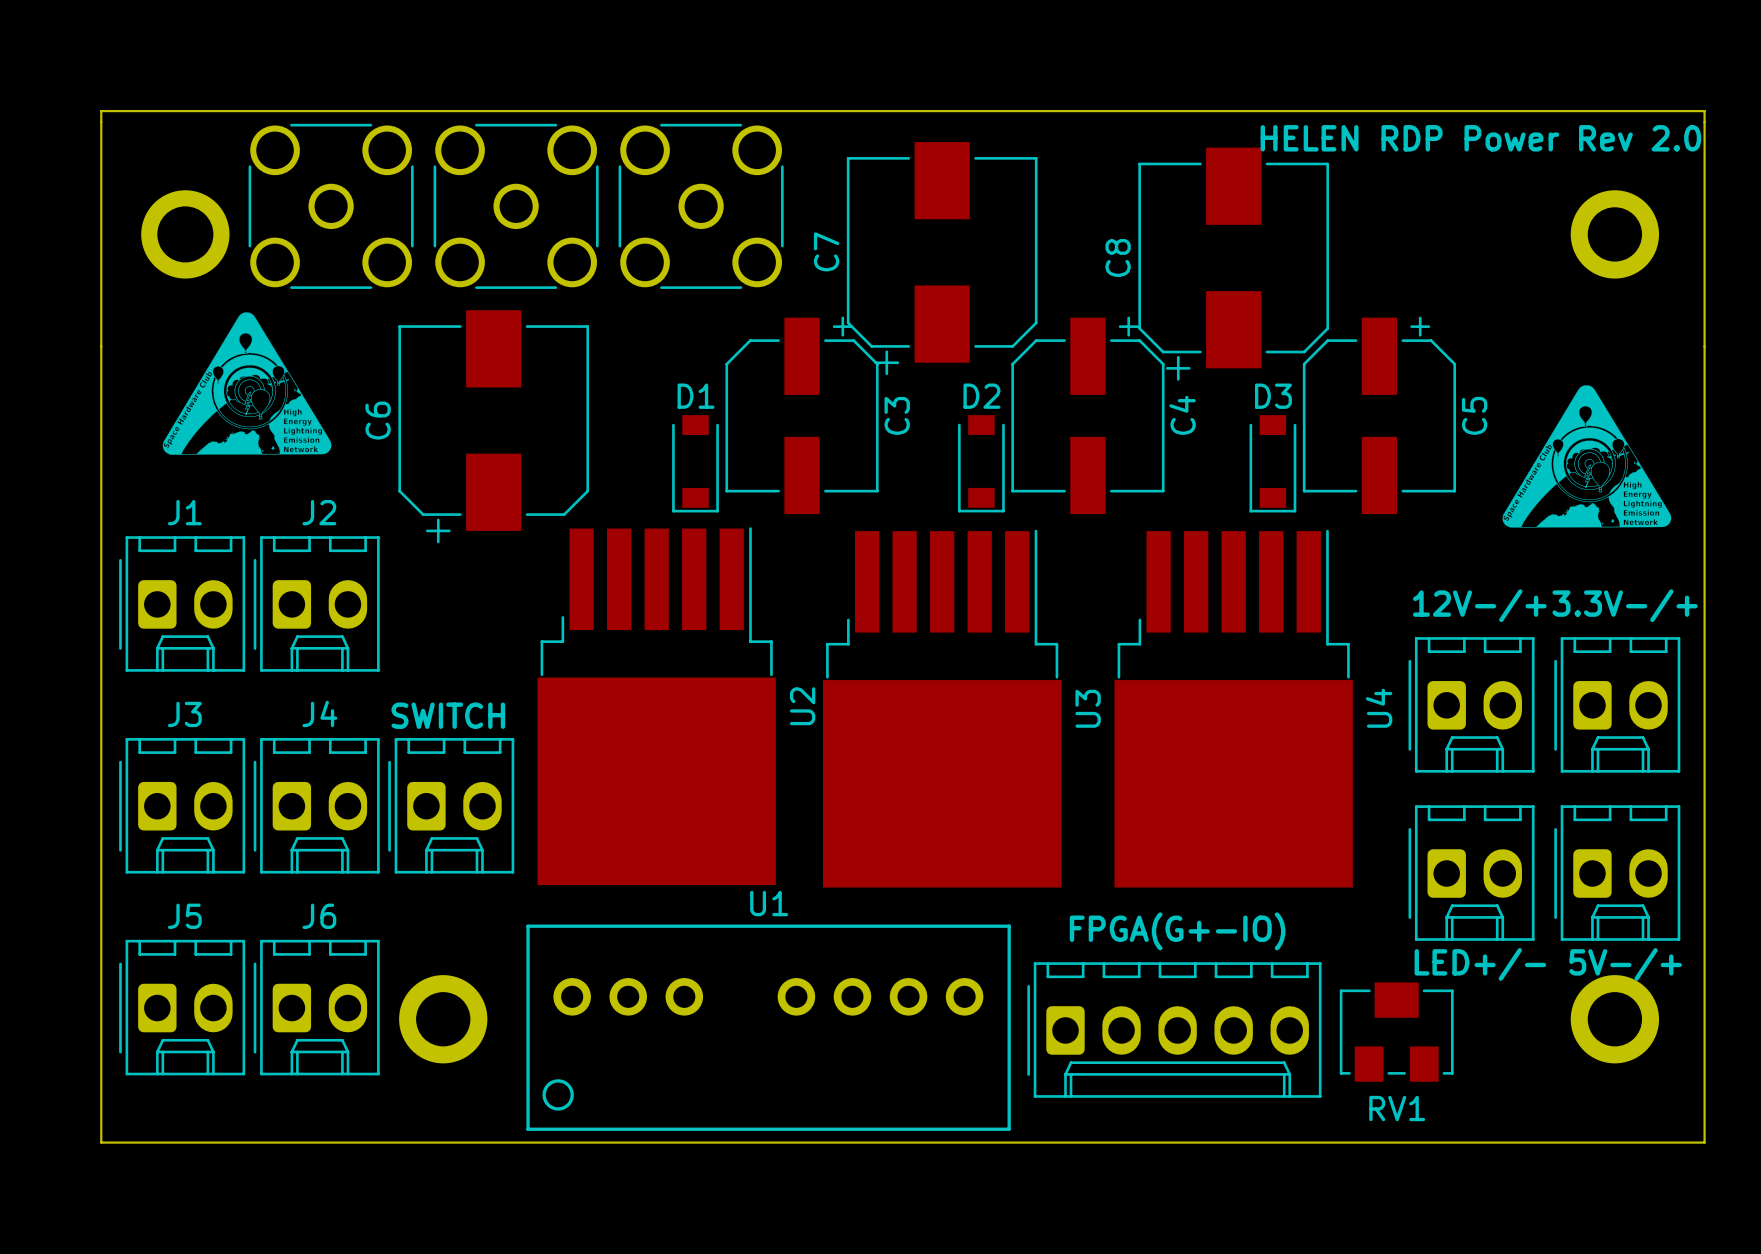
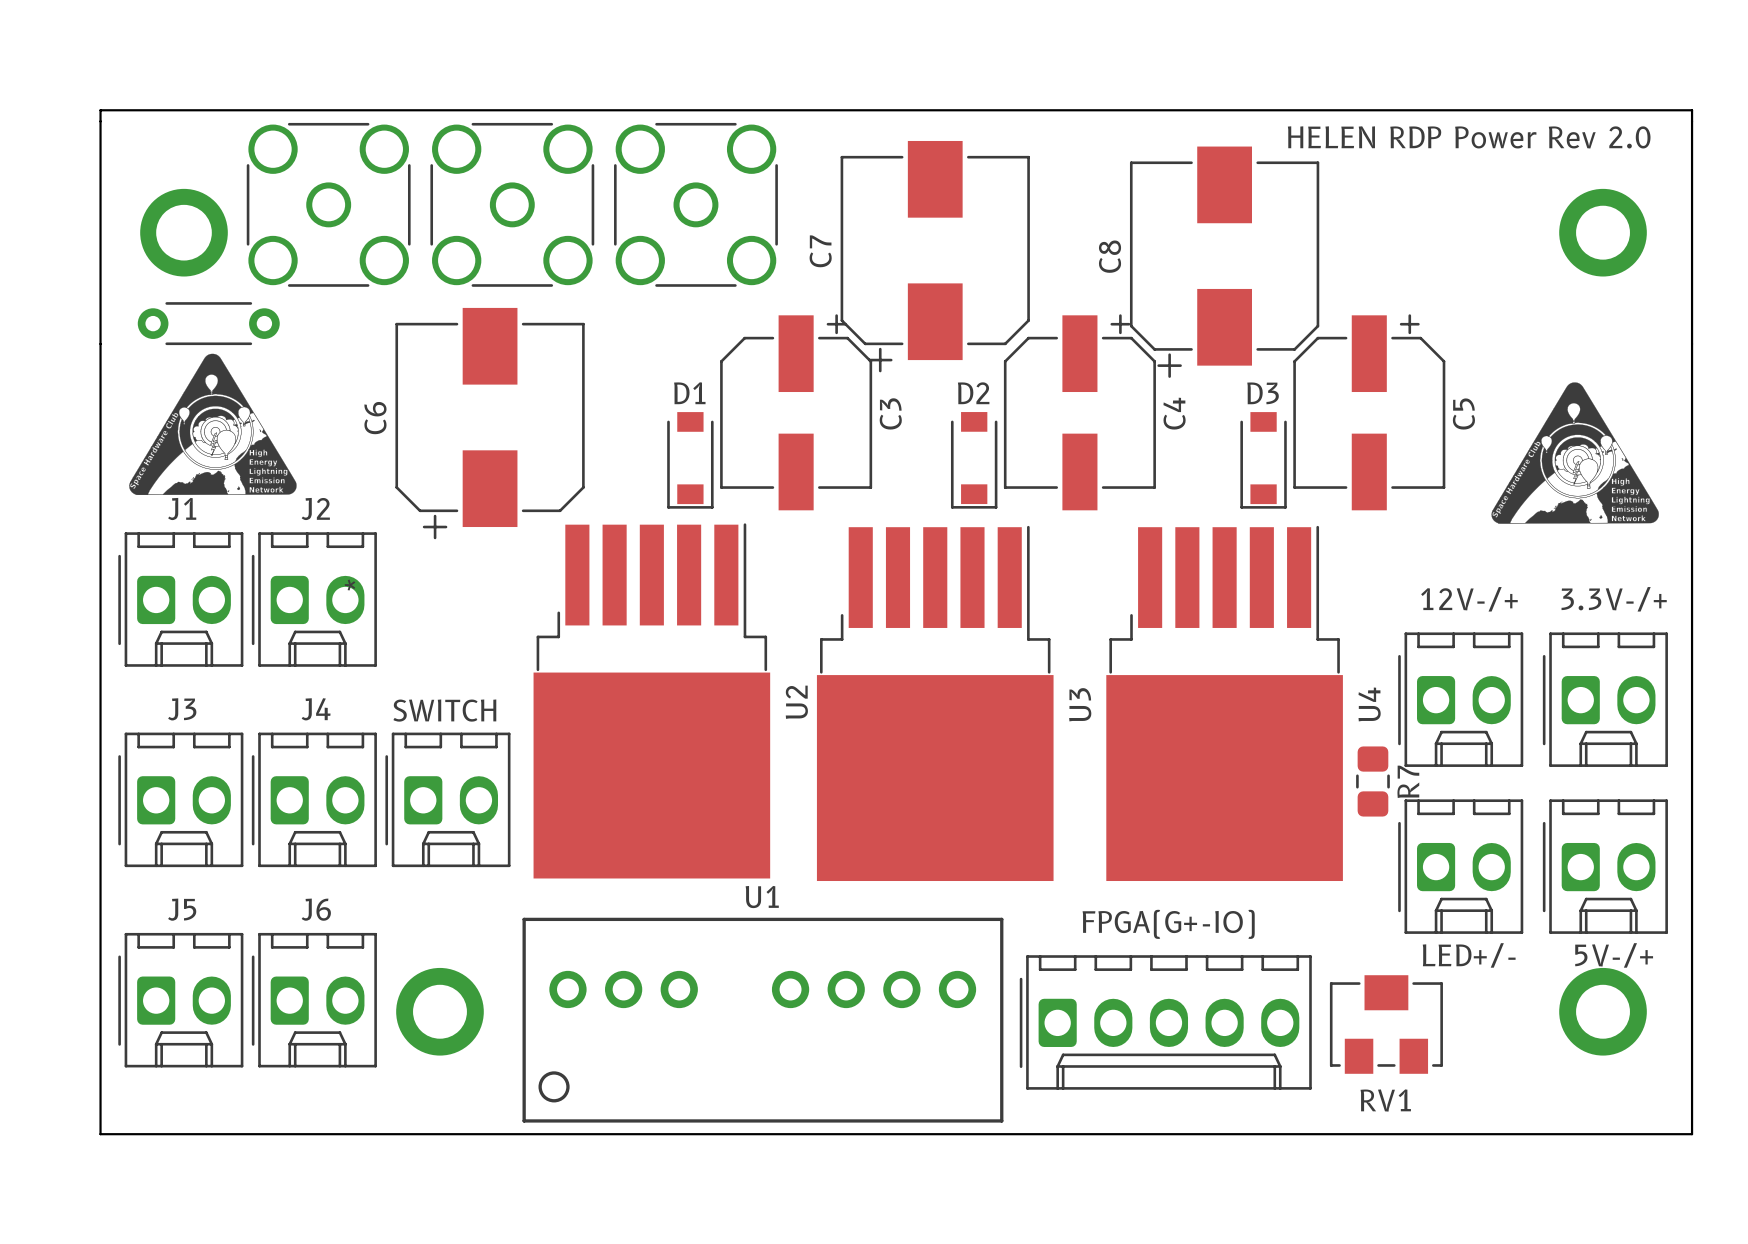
part: none -> (208, 323)
drawing position: (247, 383) -> (212, 424)
part: none -> (350, 584)
R7: none -> (1372, 781)

